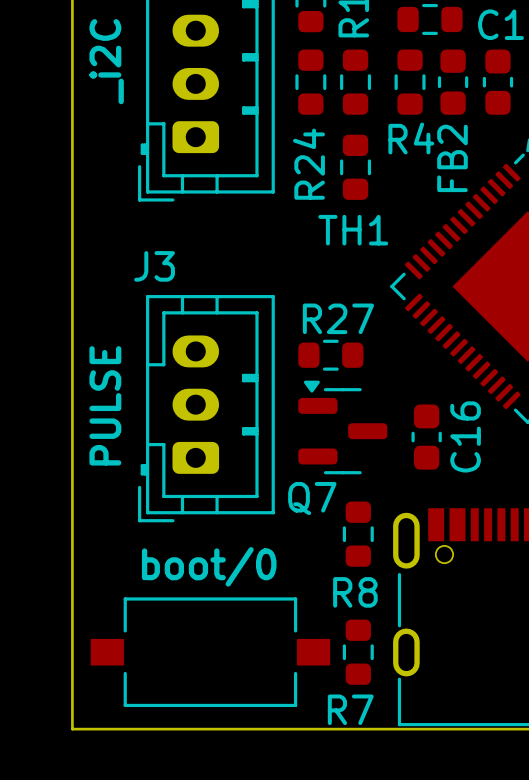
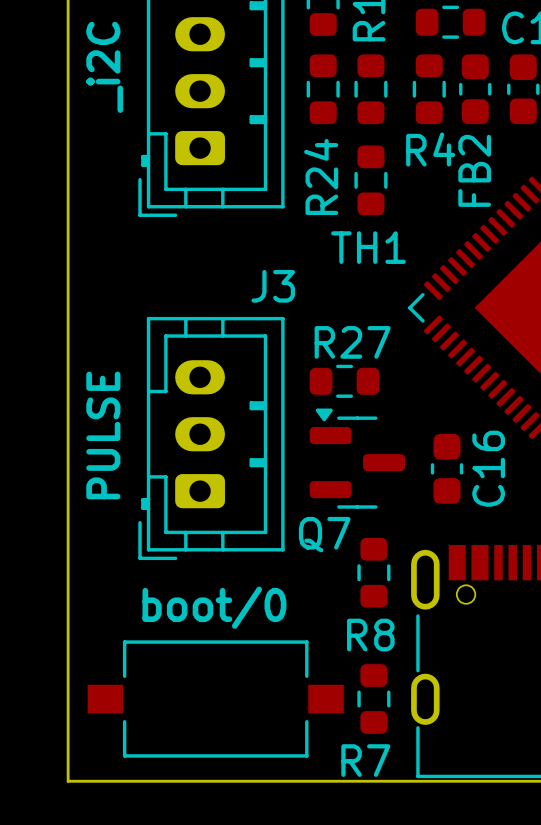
J3 name position: J3 (154, 266) -> J3 (273, 286)

